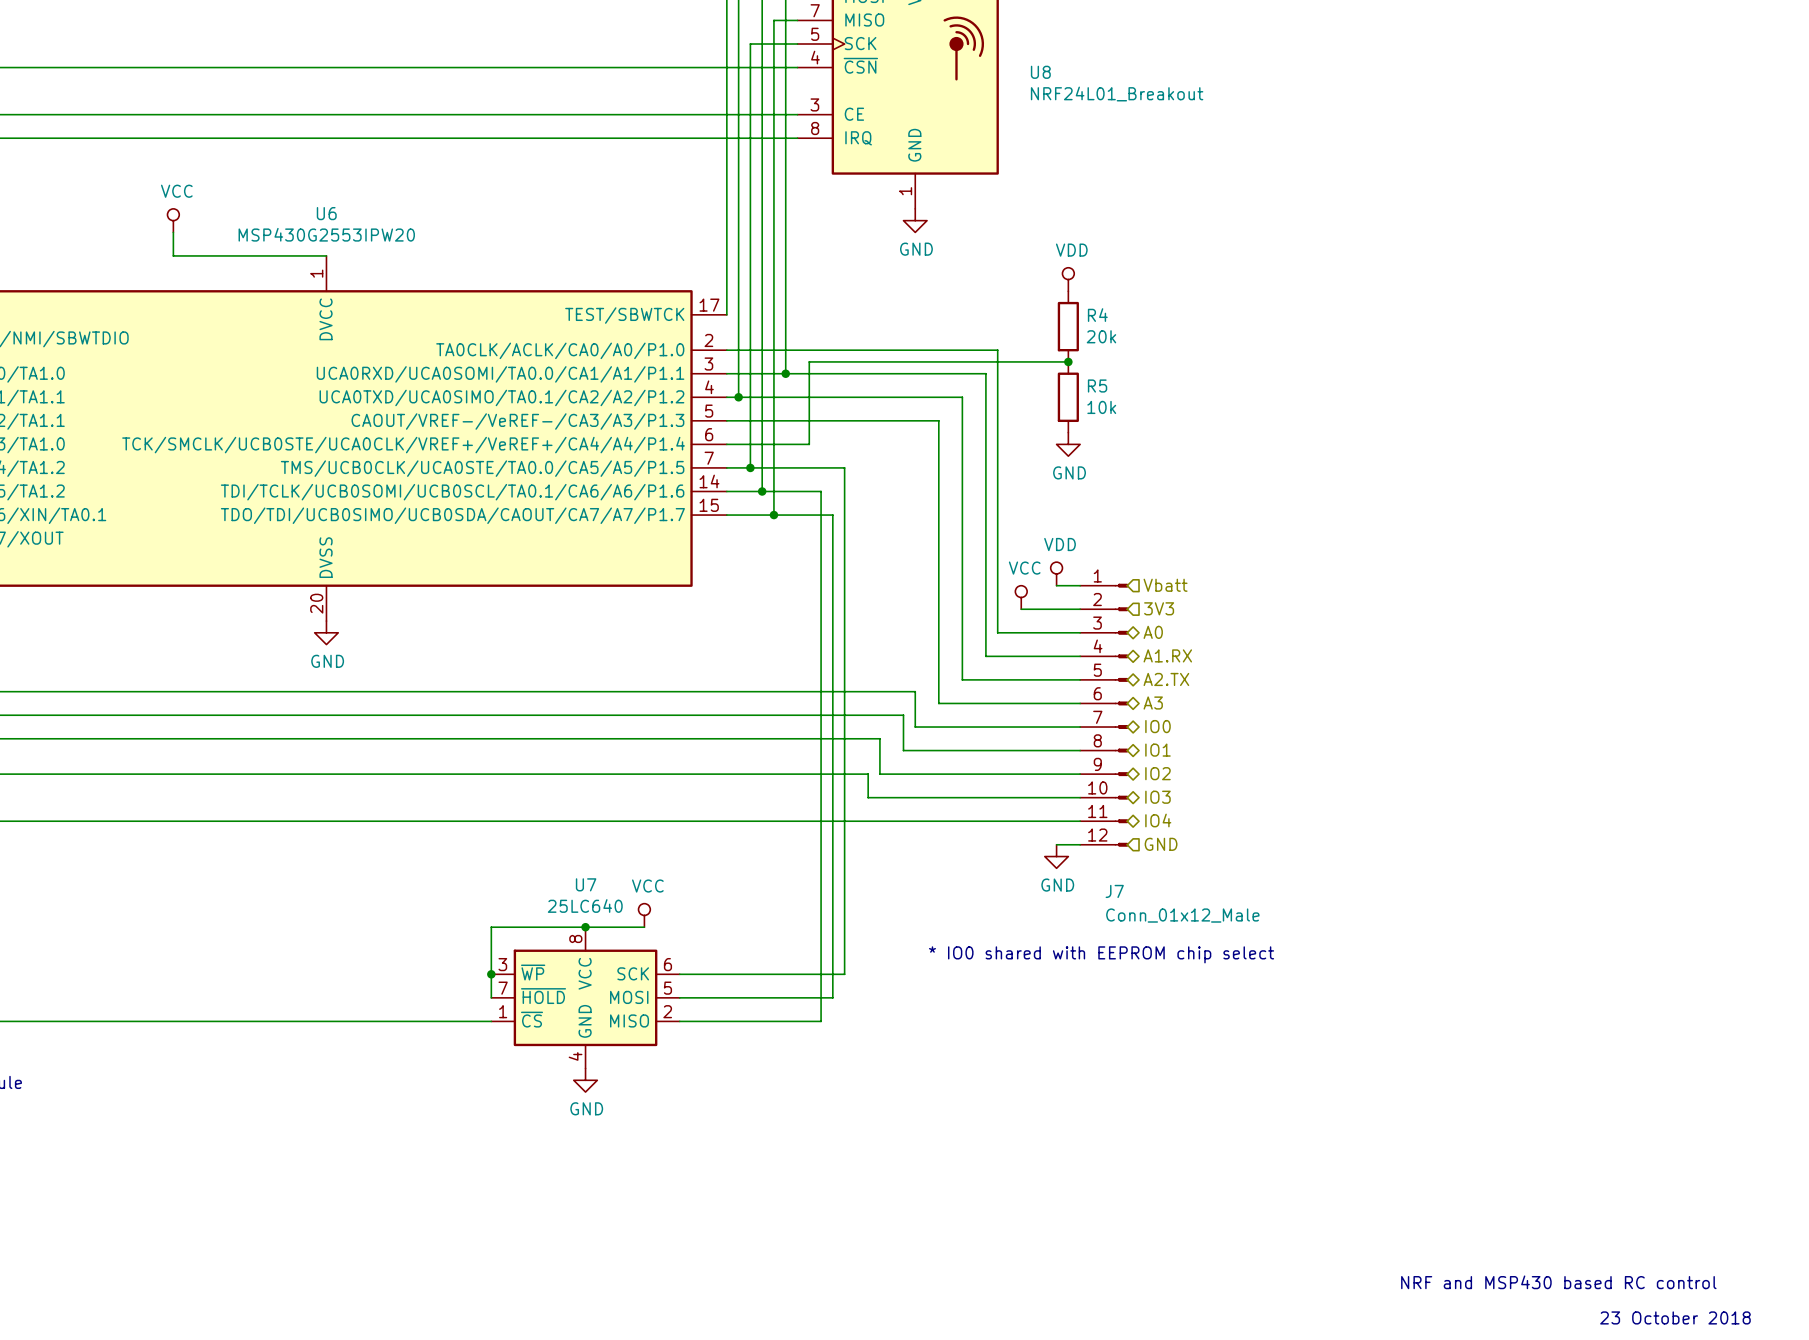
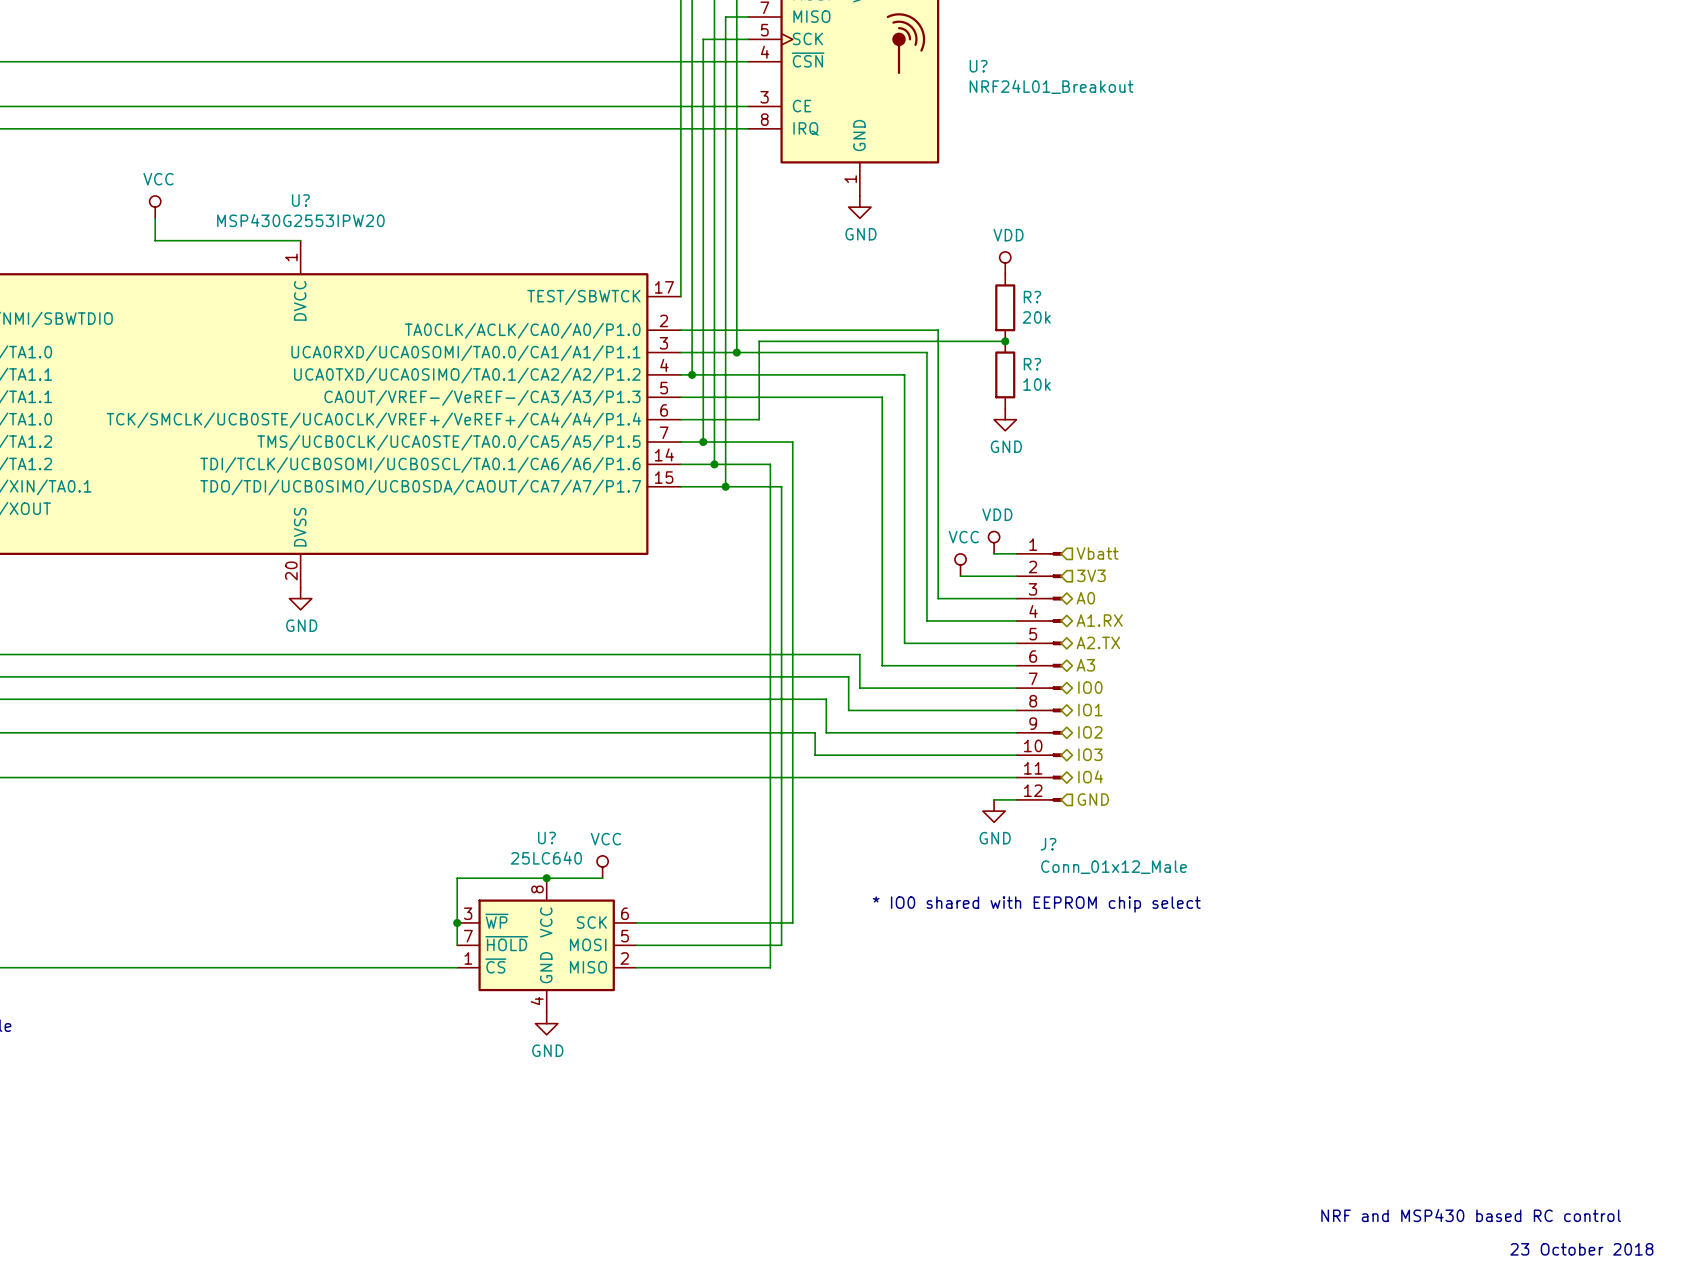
U8 name: U8 (1040, 72) -> U? (978, 66)
U6 name: U6 (326, 213) -> U? (300, 200)
R4 name: R4 (1097, 315) -> R? (1032, 297)
R5 name: R5 (1097, 386) -> R? (1032, 364)
U7 name: U7 (586, 884) -> U? (546, 837)
J7 name: J7 (1114, 891) -> J? (1048, 844)

